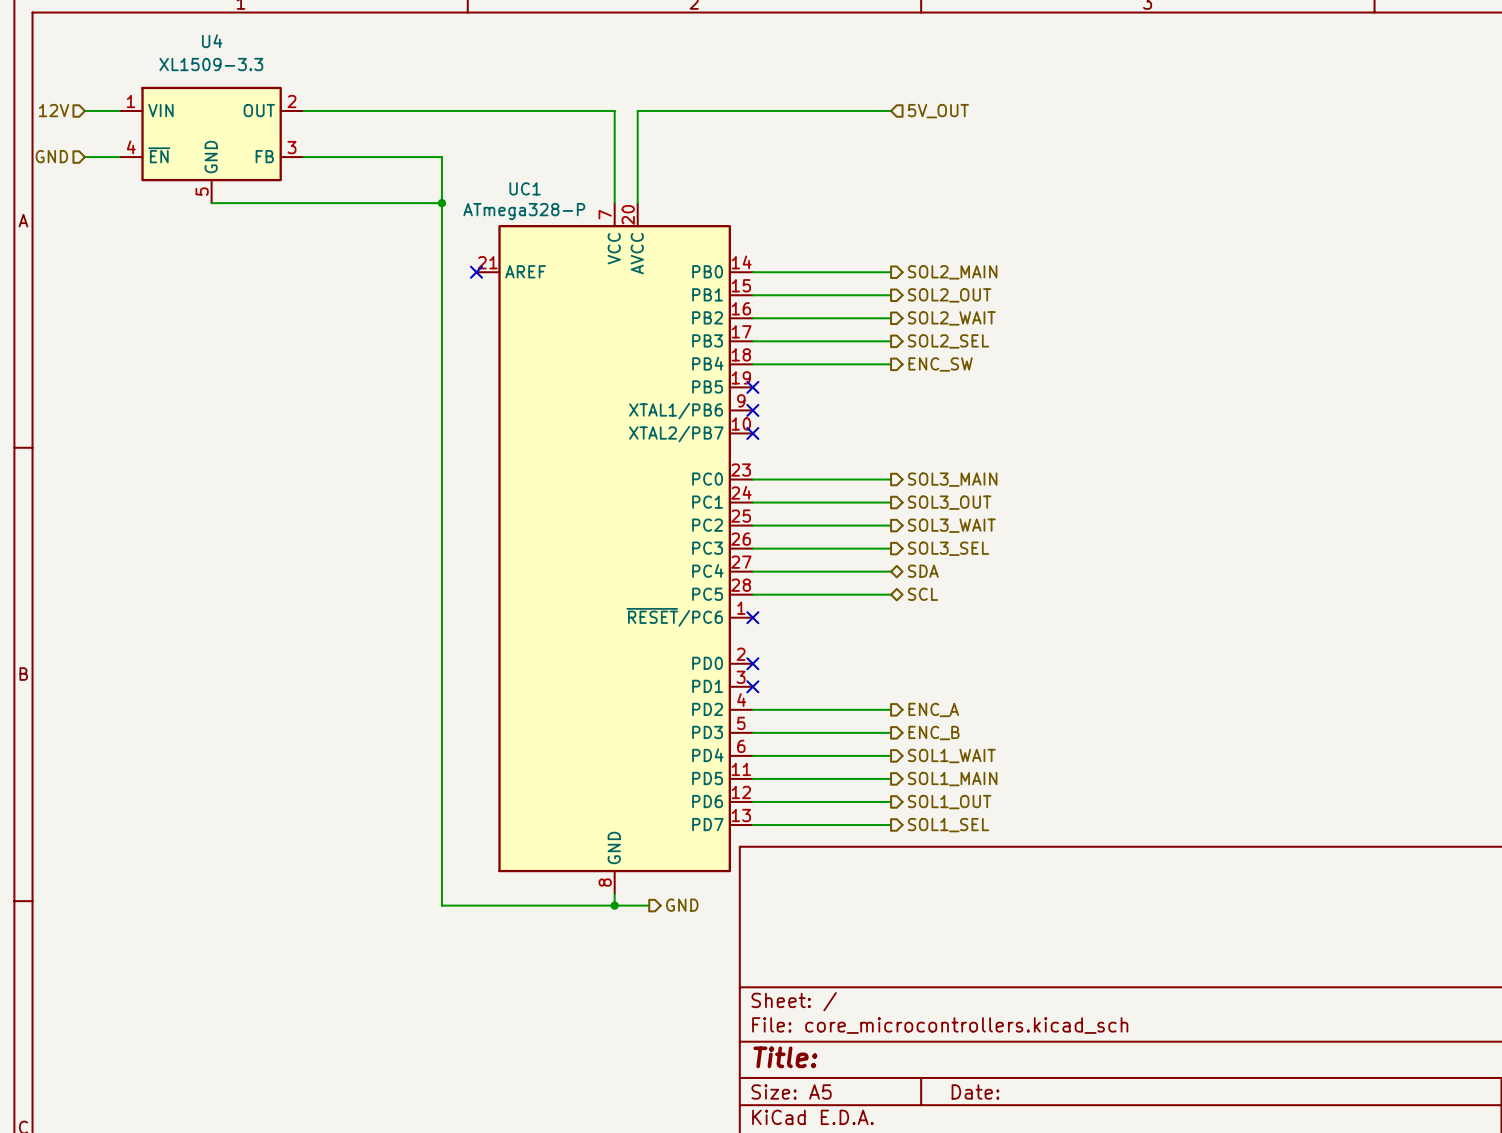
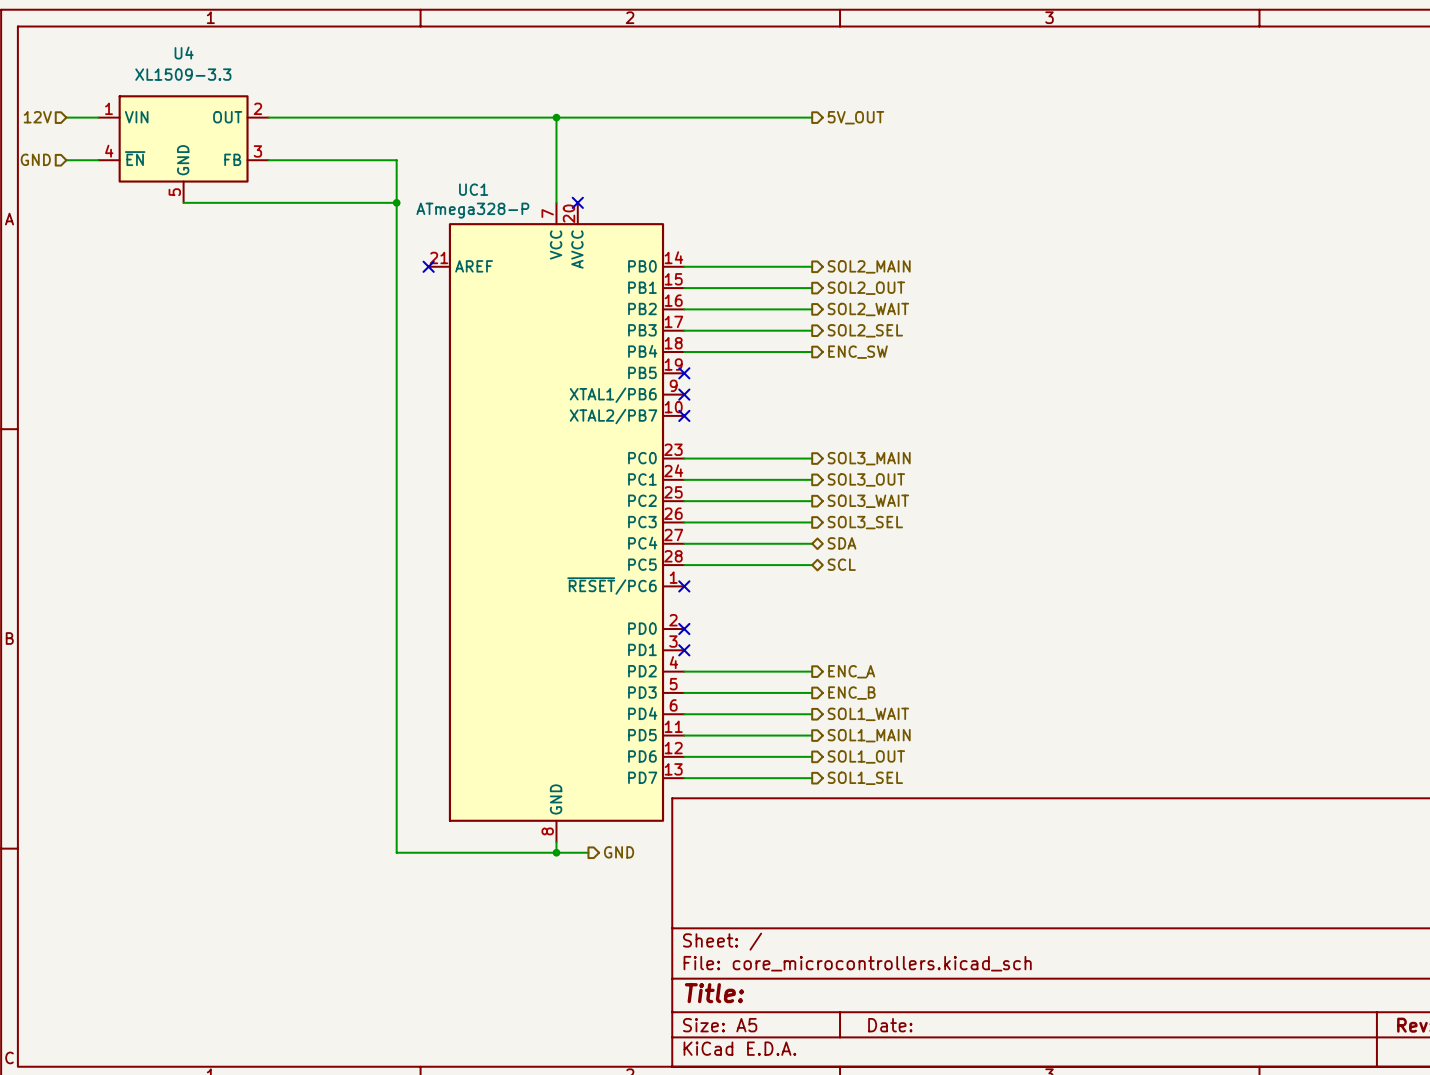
junction: none -> (556, 117)
wire: (637, 111) (637, 203) -> (577, 117) (556, 117)
hierarchical label shape: input (938, 111) -> output (855, 117)
no-connect mark: none -> (577, 202)

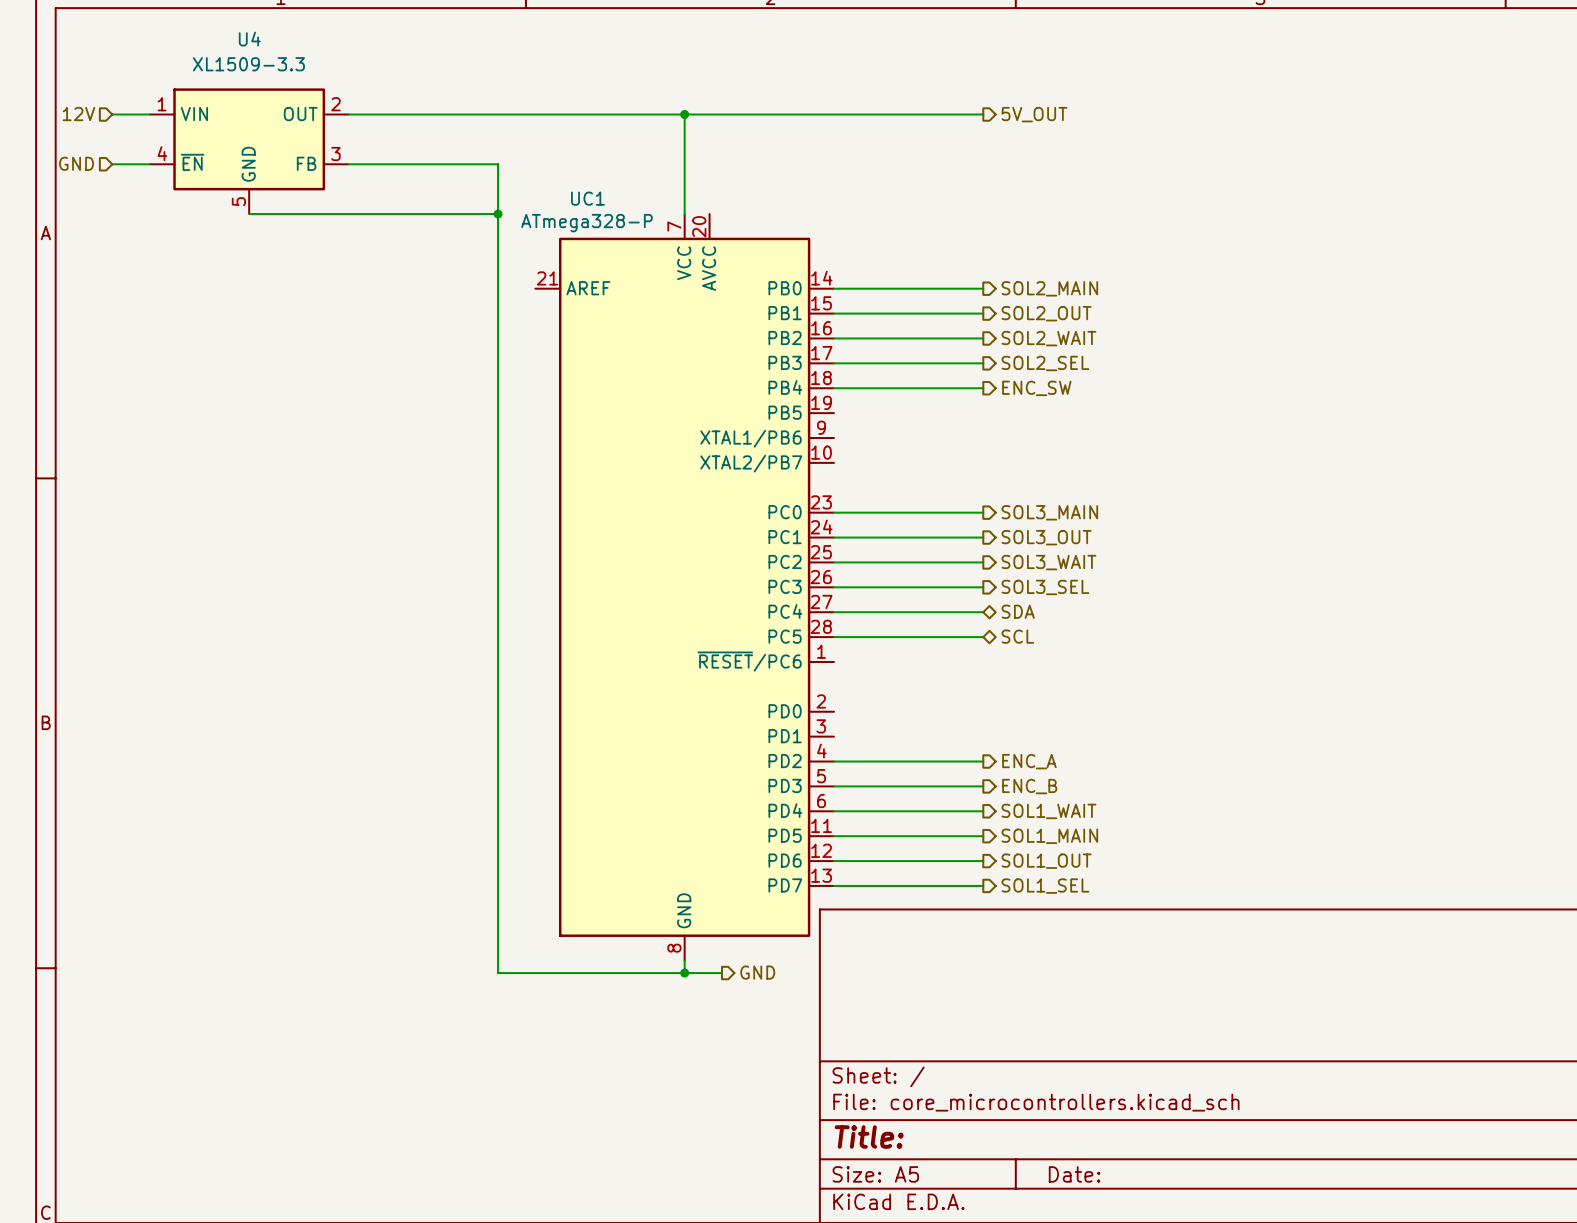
no-connect mark: (577, 202) -> none
no-connect mark: (428, 266) -> none
no-connect mark: (684, 373) -> none
no-connect mark: (684, 394) -> none
no-connect mark: (684, 415) -> none
no-connect mark: (684, 586) -> none
no-connect mark: (684, 629) -> none
no-connect mark: (684, 650) -> none

